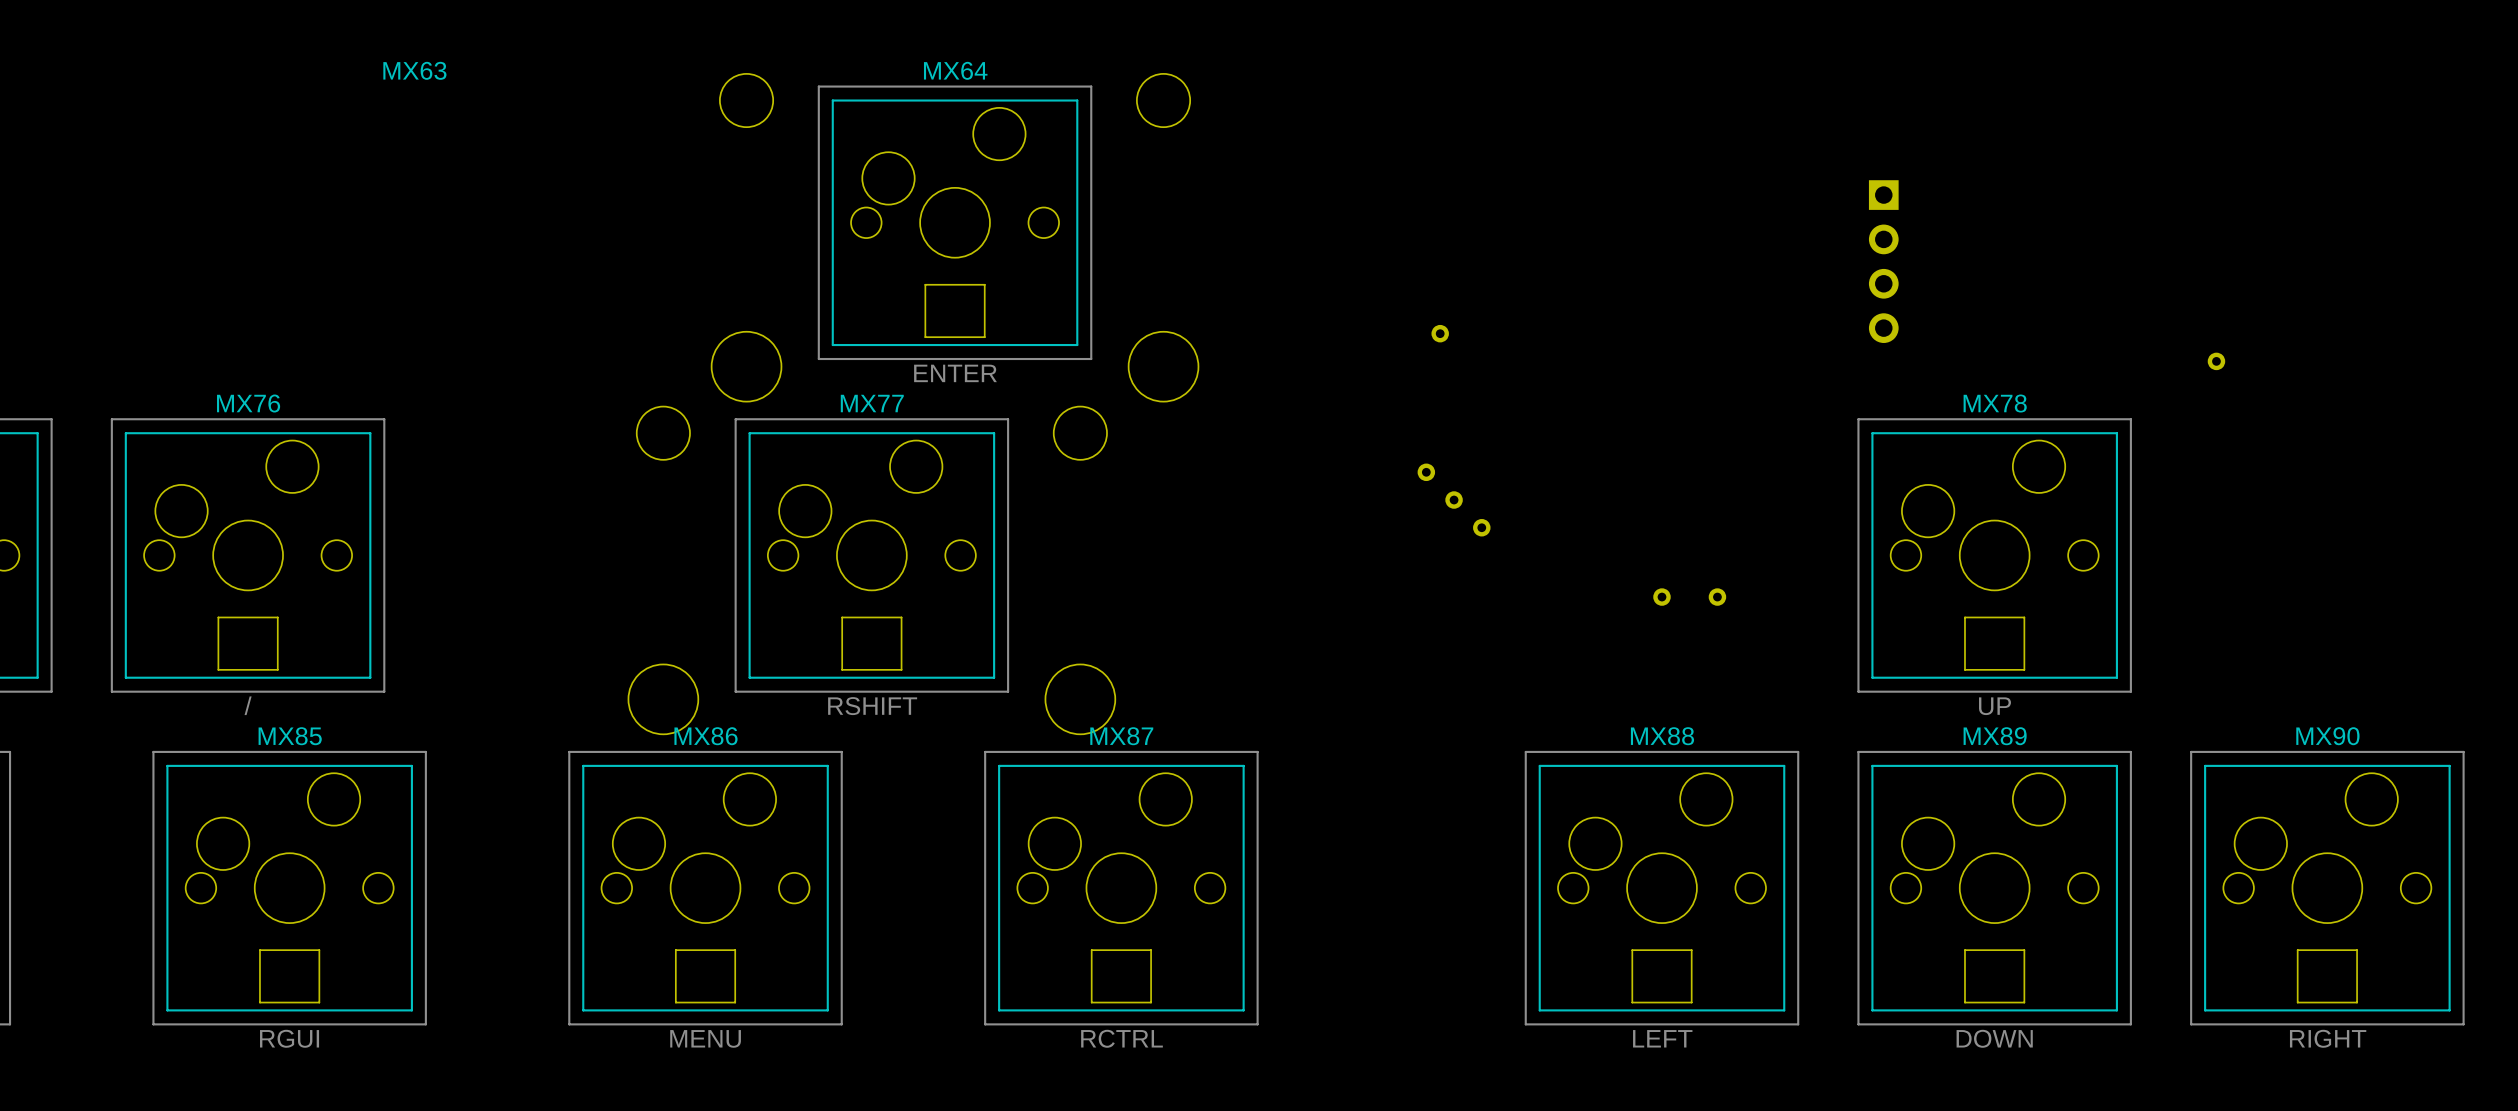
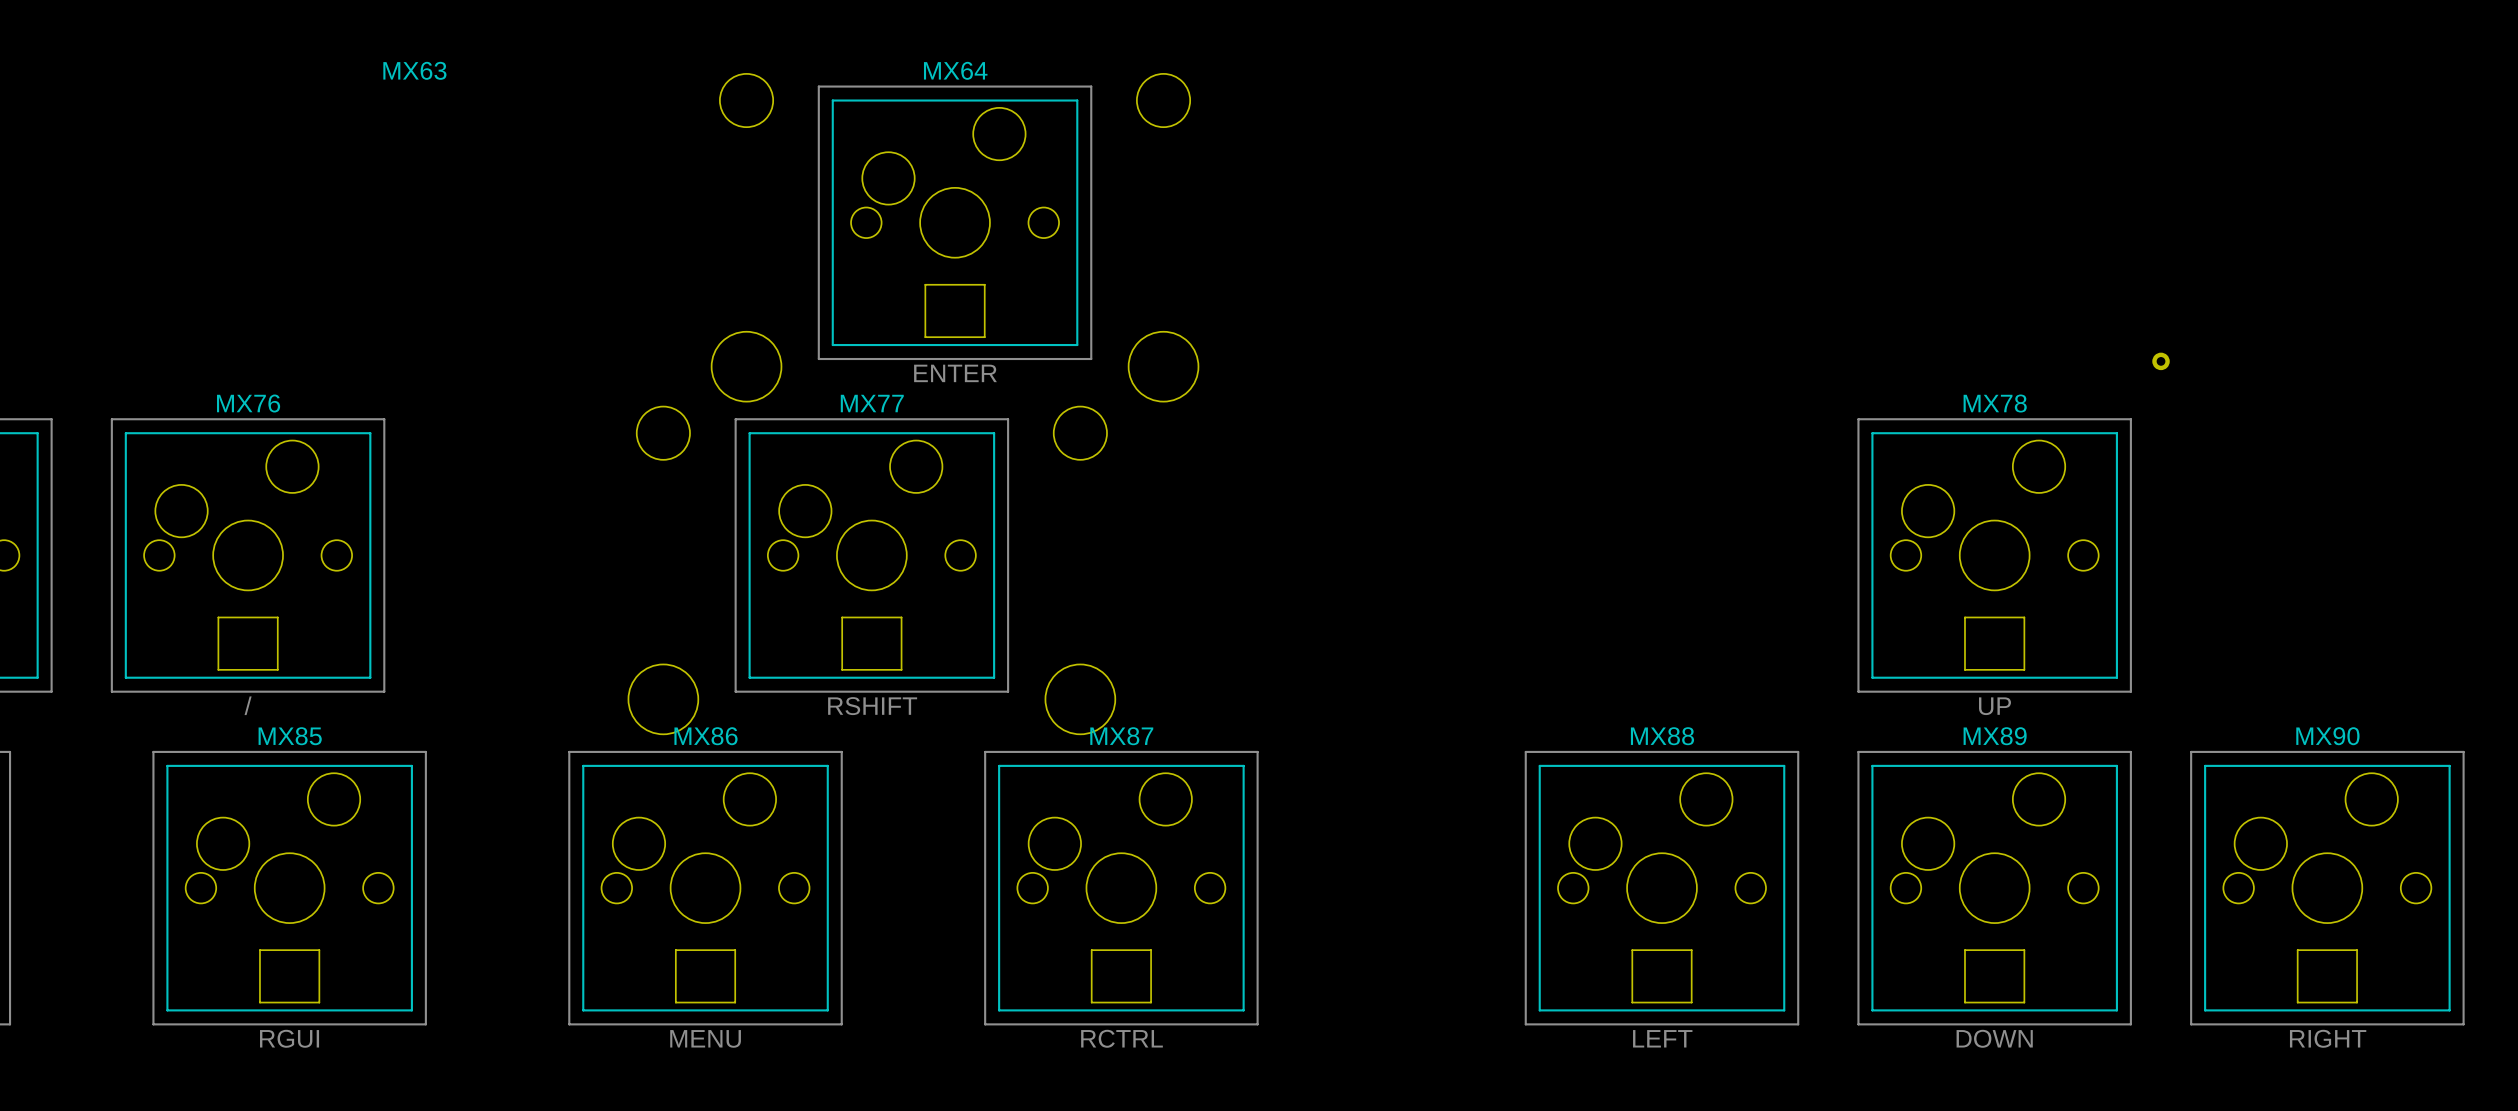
part: (1883, 261) -> none
part: (1440, 333) -> none
part position: (2216, 361) -> (2161, 361)
part: (1426, 472) -> none
part: (1454, 500) -> none
part: (1481, 527) -> none
part: (1661, 597) -> none
part: (1717, 597) -> none

